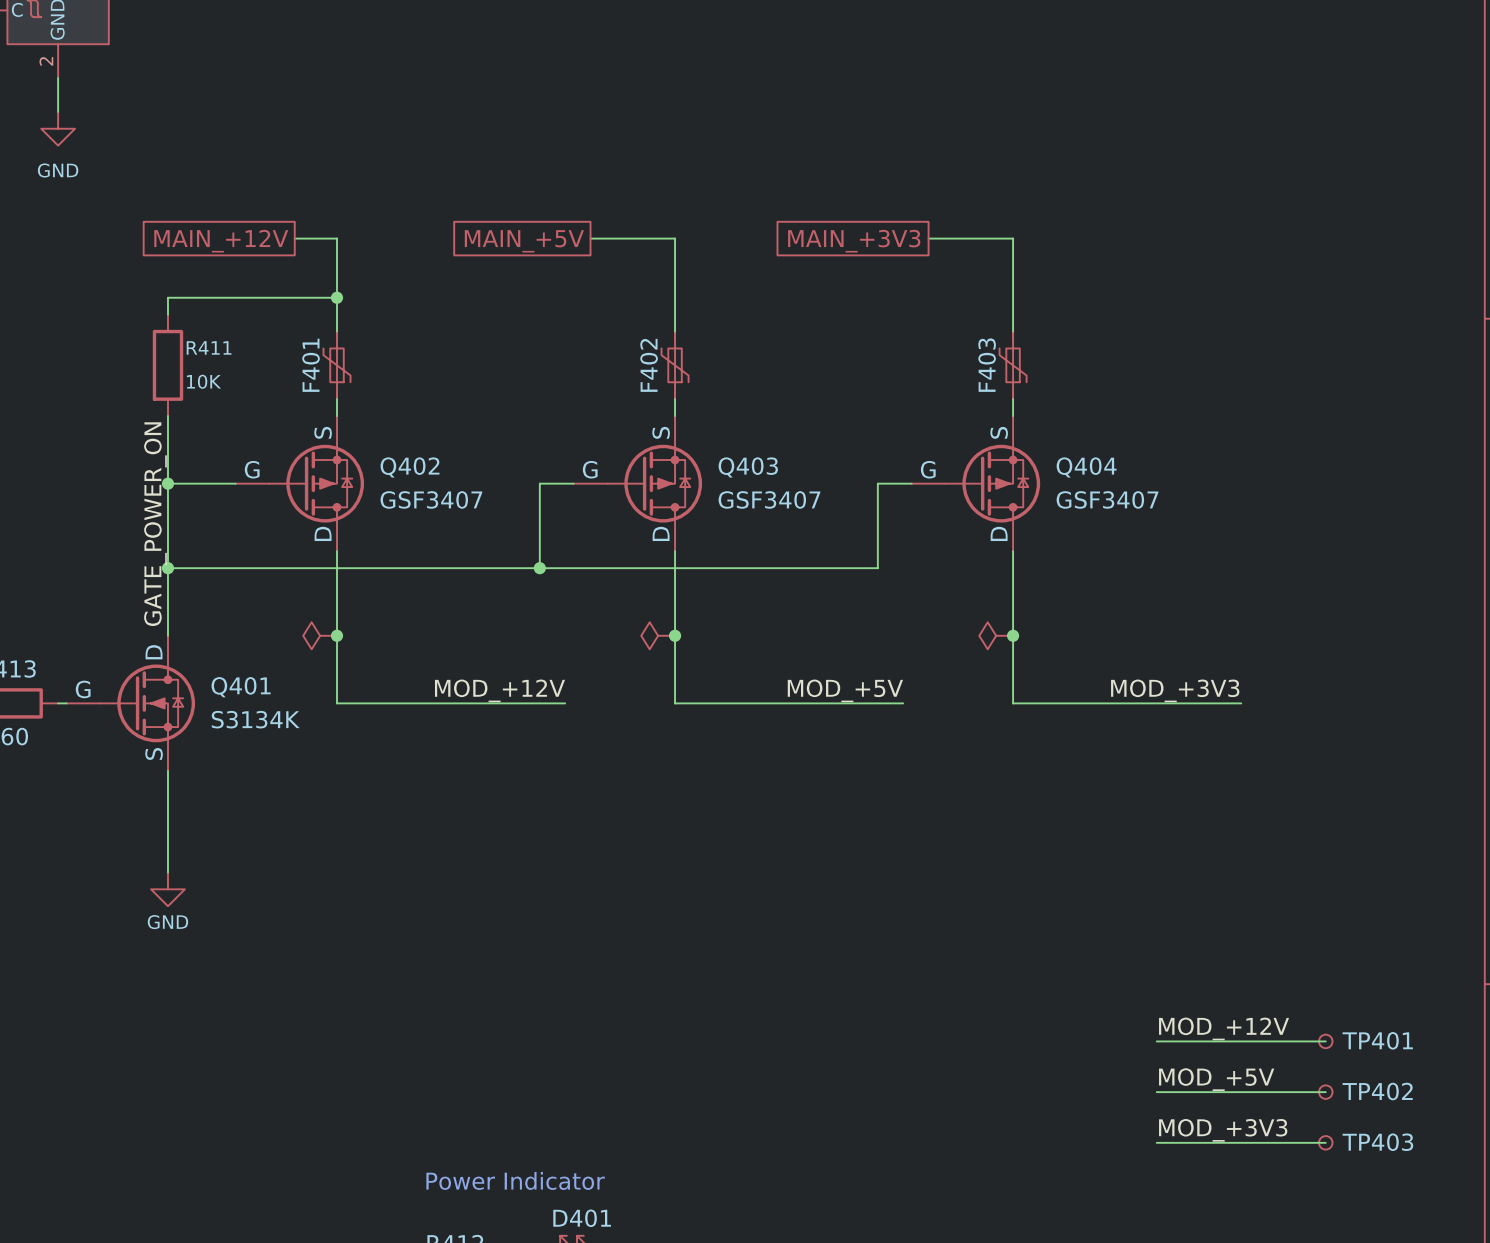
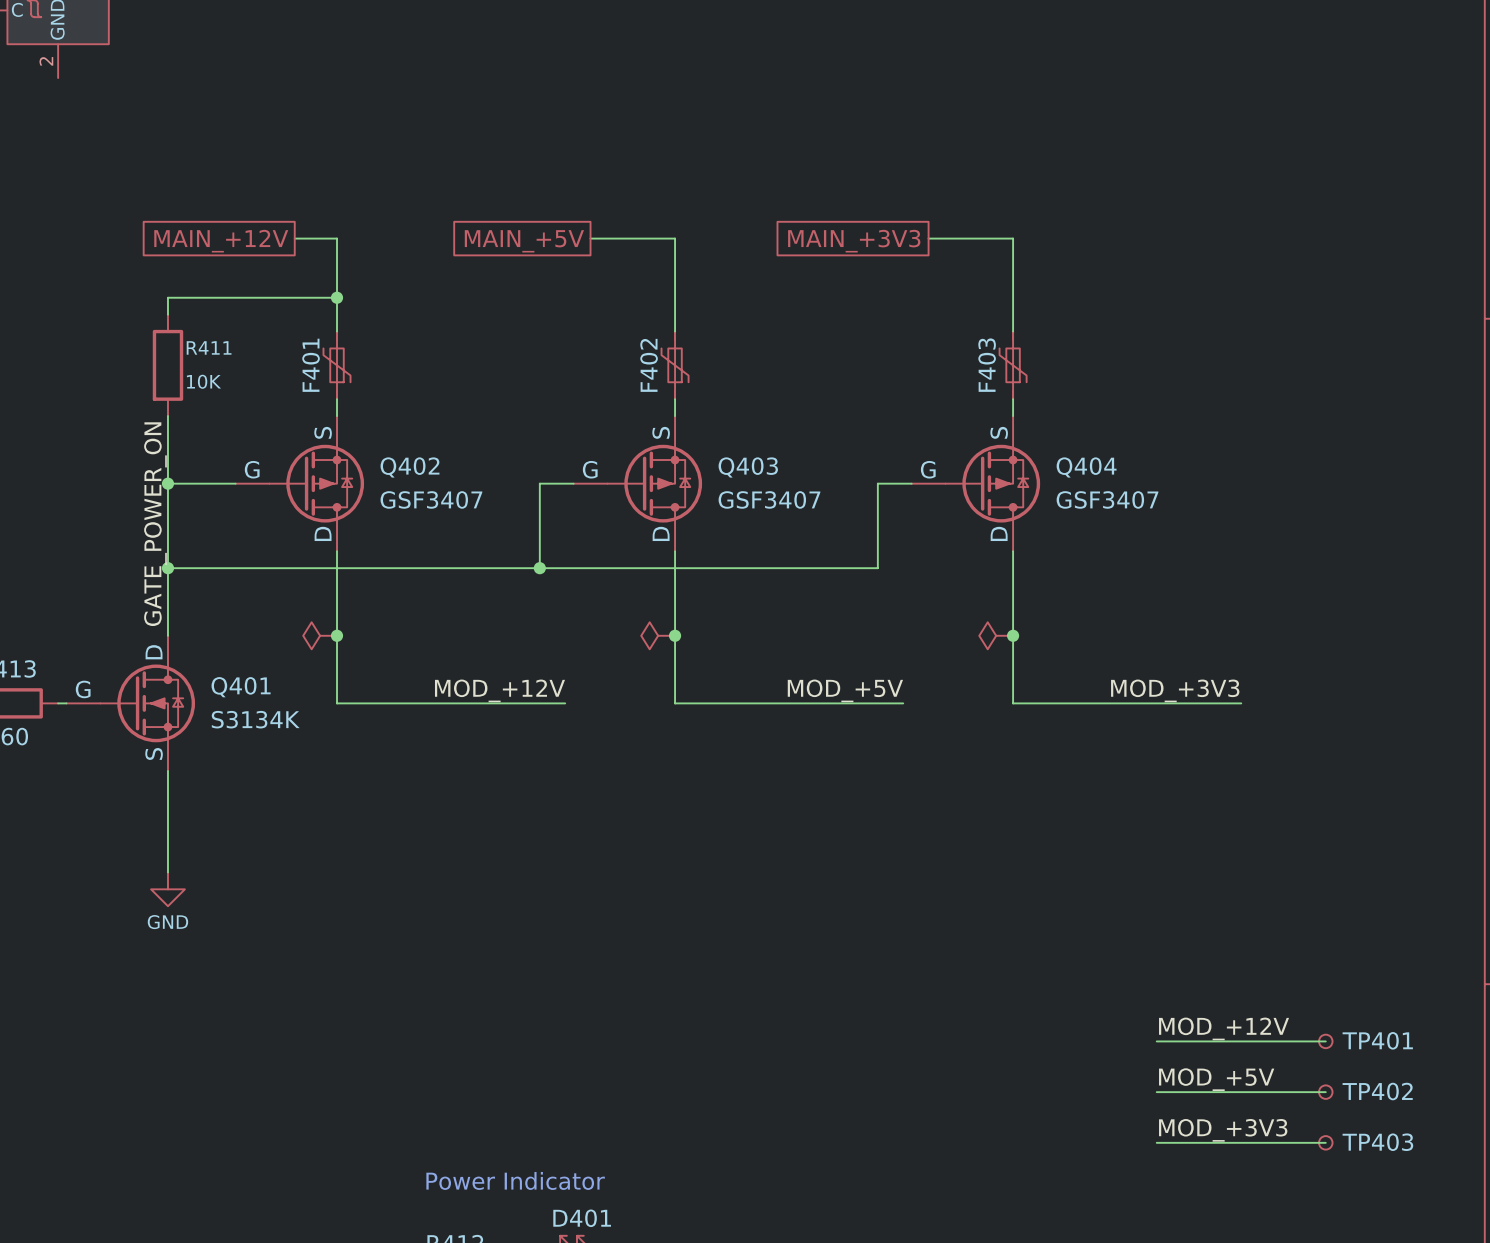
wire: (58, 78) (58, 111) -> none
power symbol: GND (58, 128) -> none

